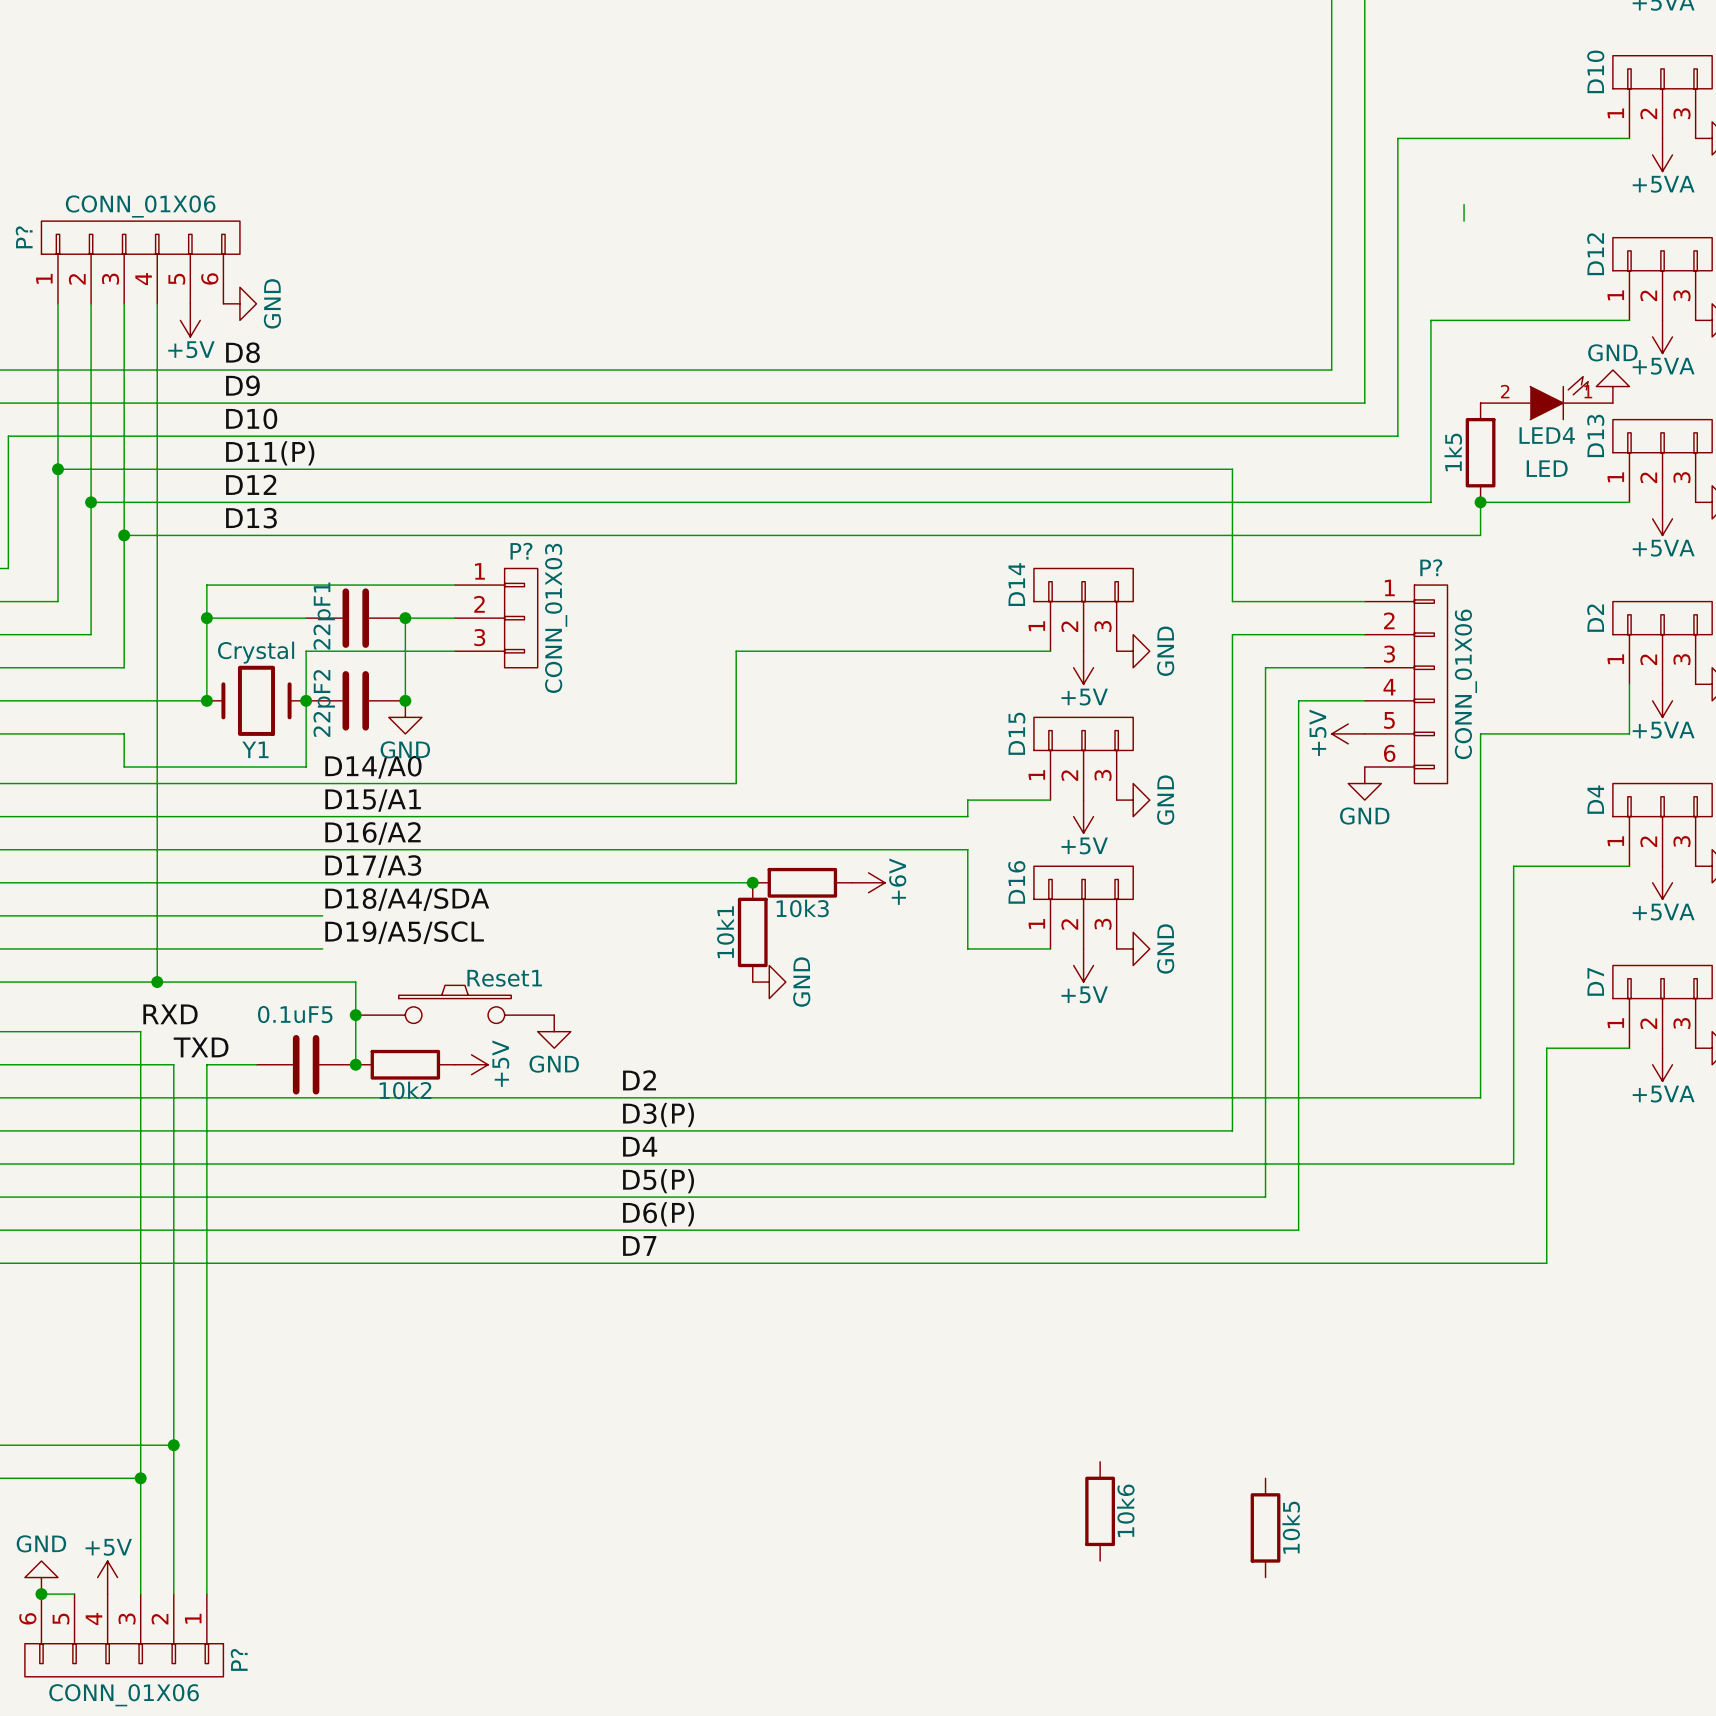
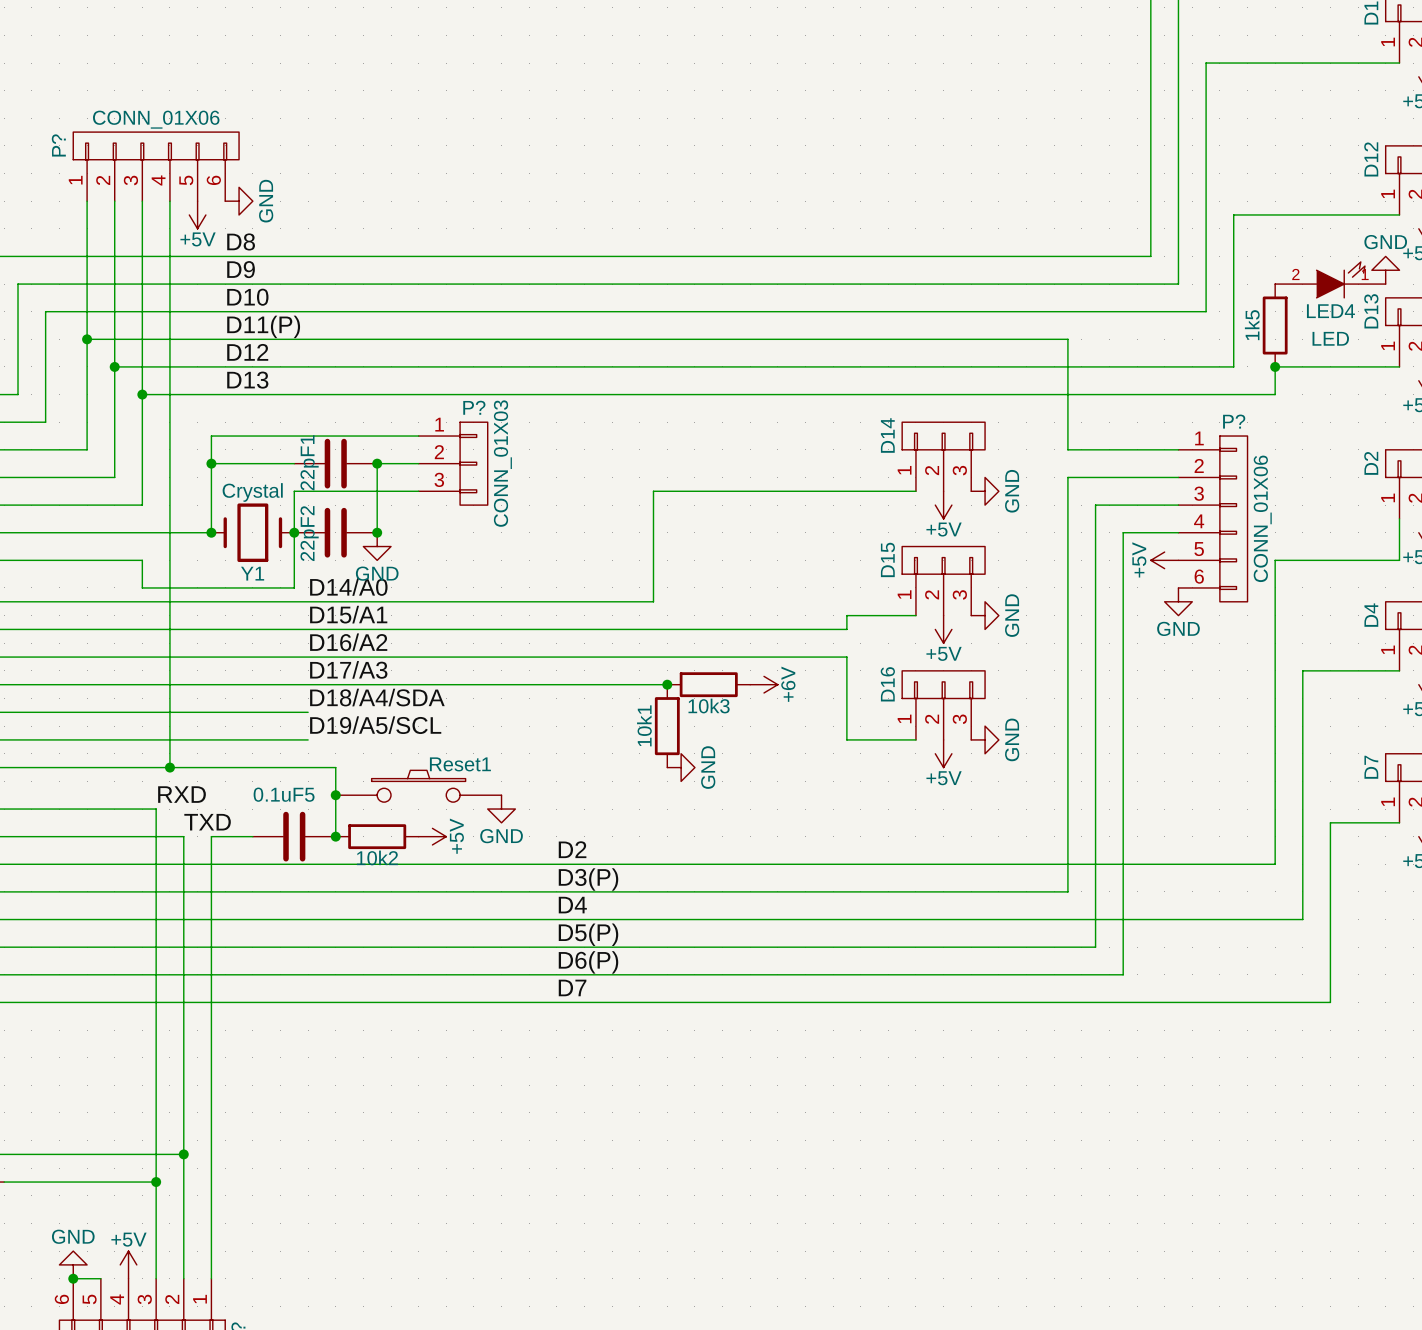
wire: (1464, 204) (1464, 221) -> none
10k6: (1100, 1511) -> none
10k5: (1265, 1527) -> none

